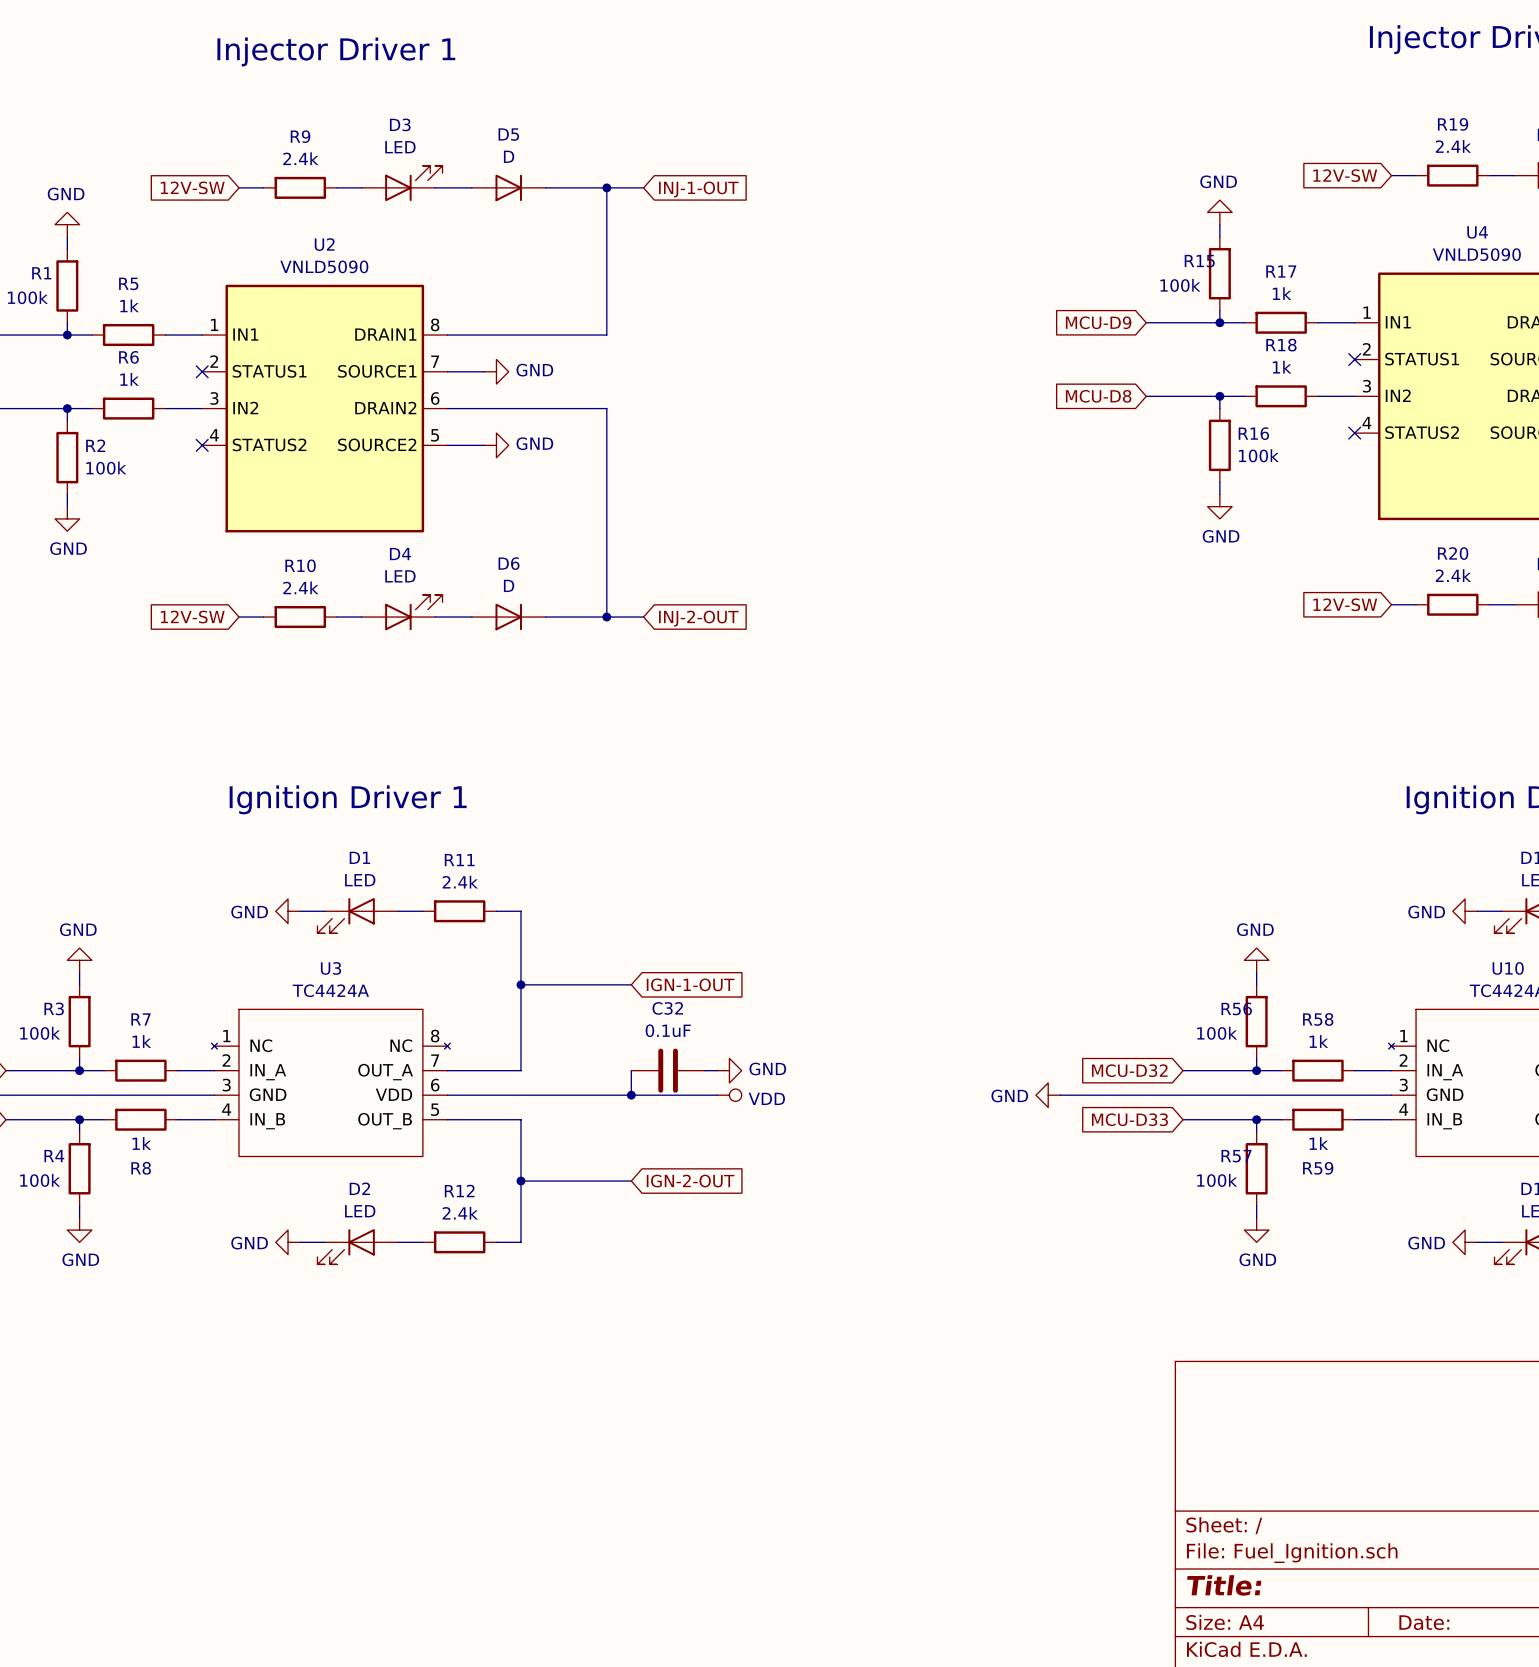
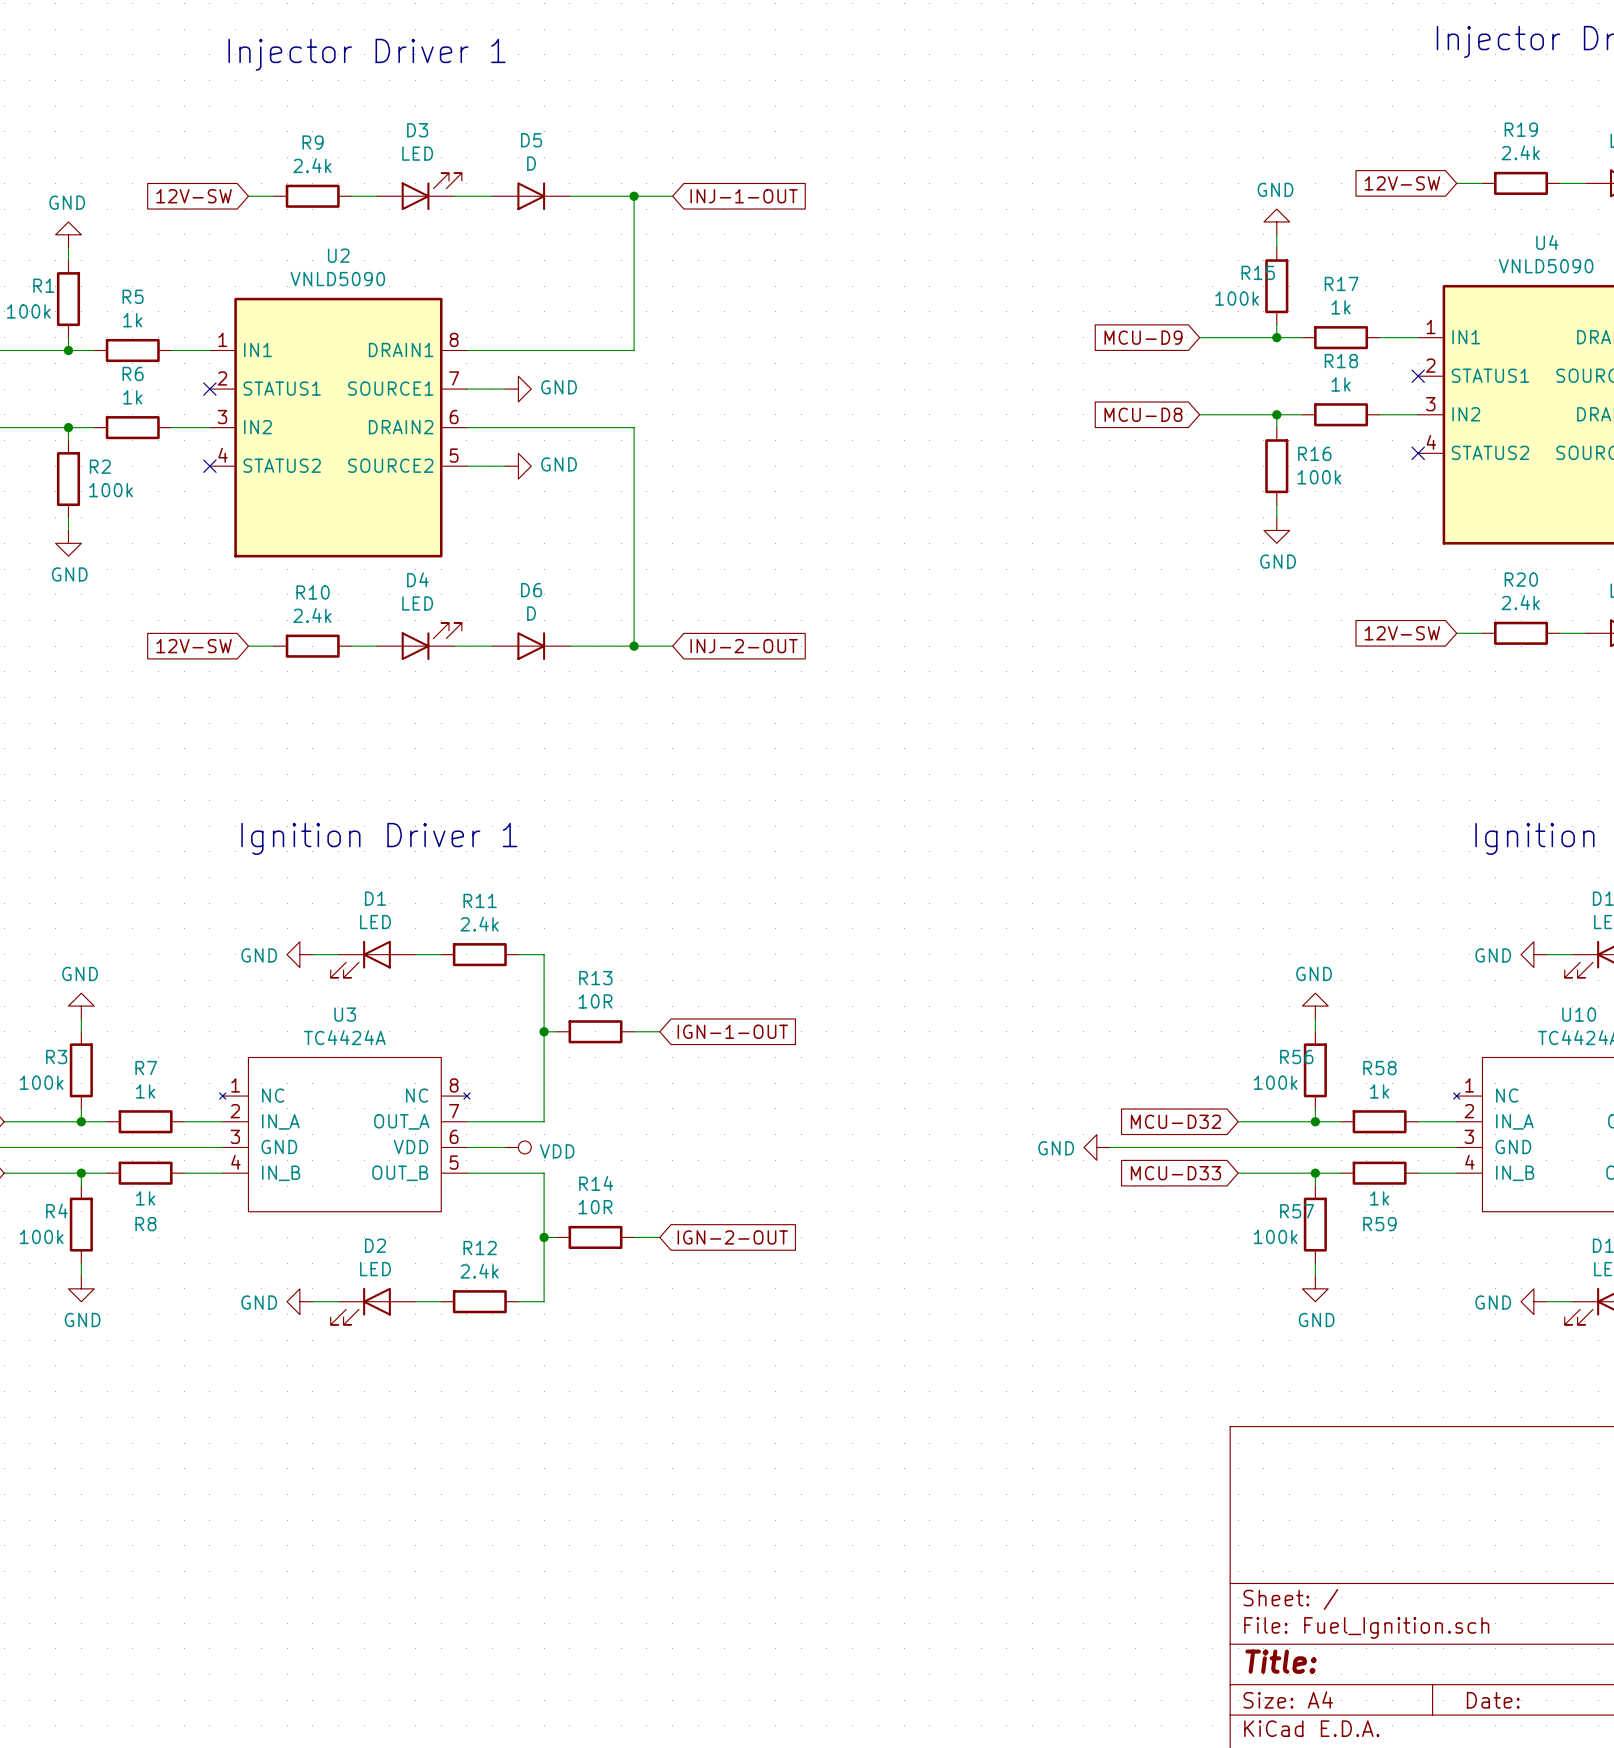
wire: (533, 984) (606, 984) -> none
R13: none -> 10R (595, 1031)
wire: (631, 1070) (631, 1095) -> none
C32: 0.1uF (668, 1070) -> none
wire: (704, 1070) (717, 1070) -> none
power symbol: GND (729, 1070) -> none
wire: (484, 1095) (717, 1095) -> none
junction: (631, 1095) -> none
power symbol position: VDD (729, 1095) -> VDD (518, 1147)
wire: (533, 1181) (606, 1181) -> none
R14: none -> 10R (595, 1237)

